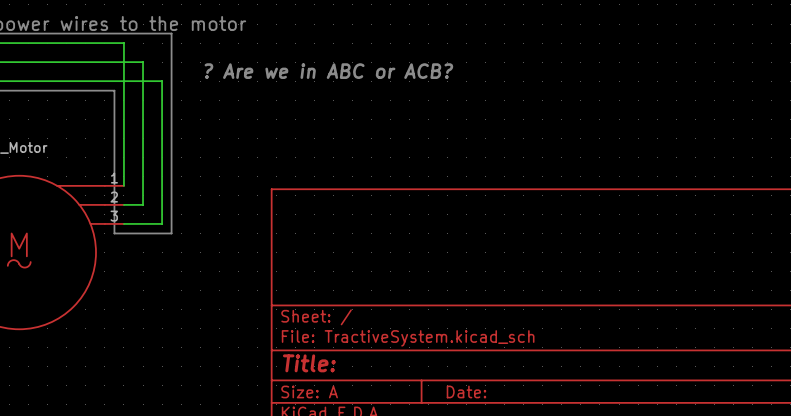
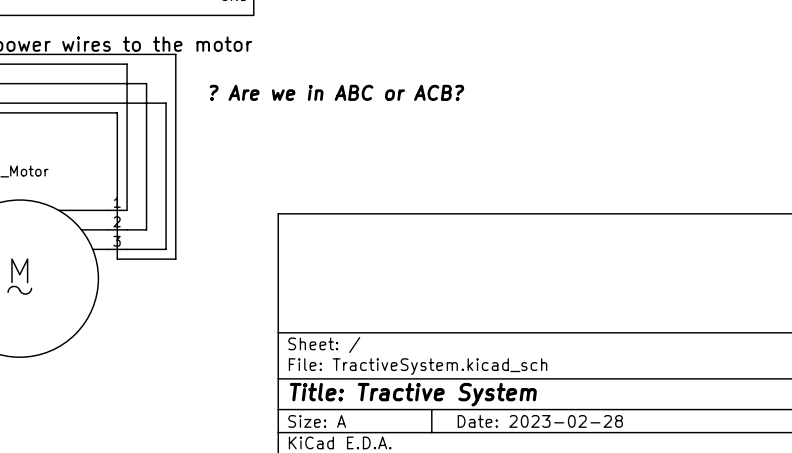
title block: Title: (309, 363) -> Title: Tractive System (413, 394)
title block: Date: (466, 391) -> Date: 2023-02-28 (540, 421)

